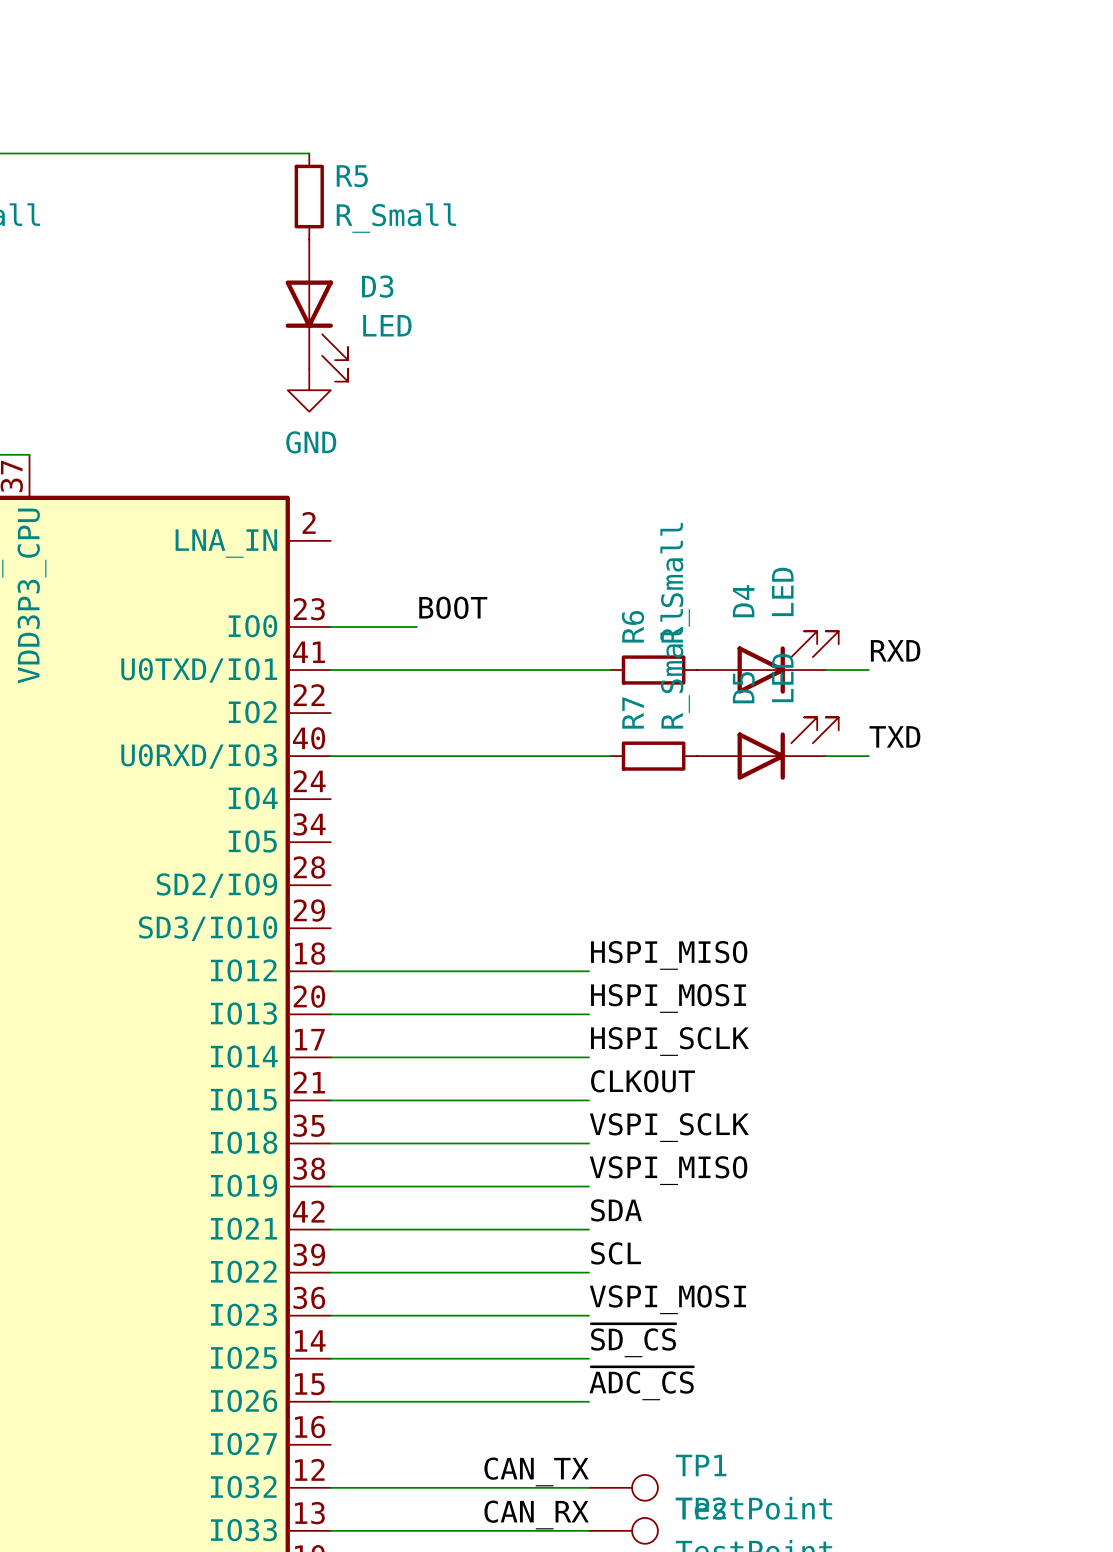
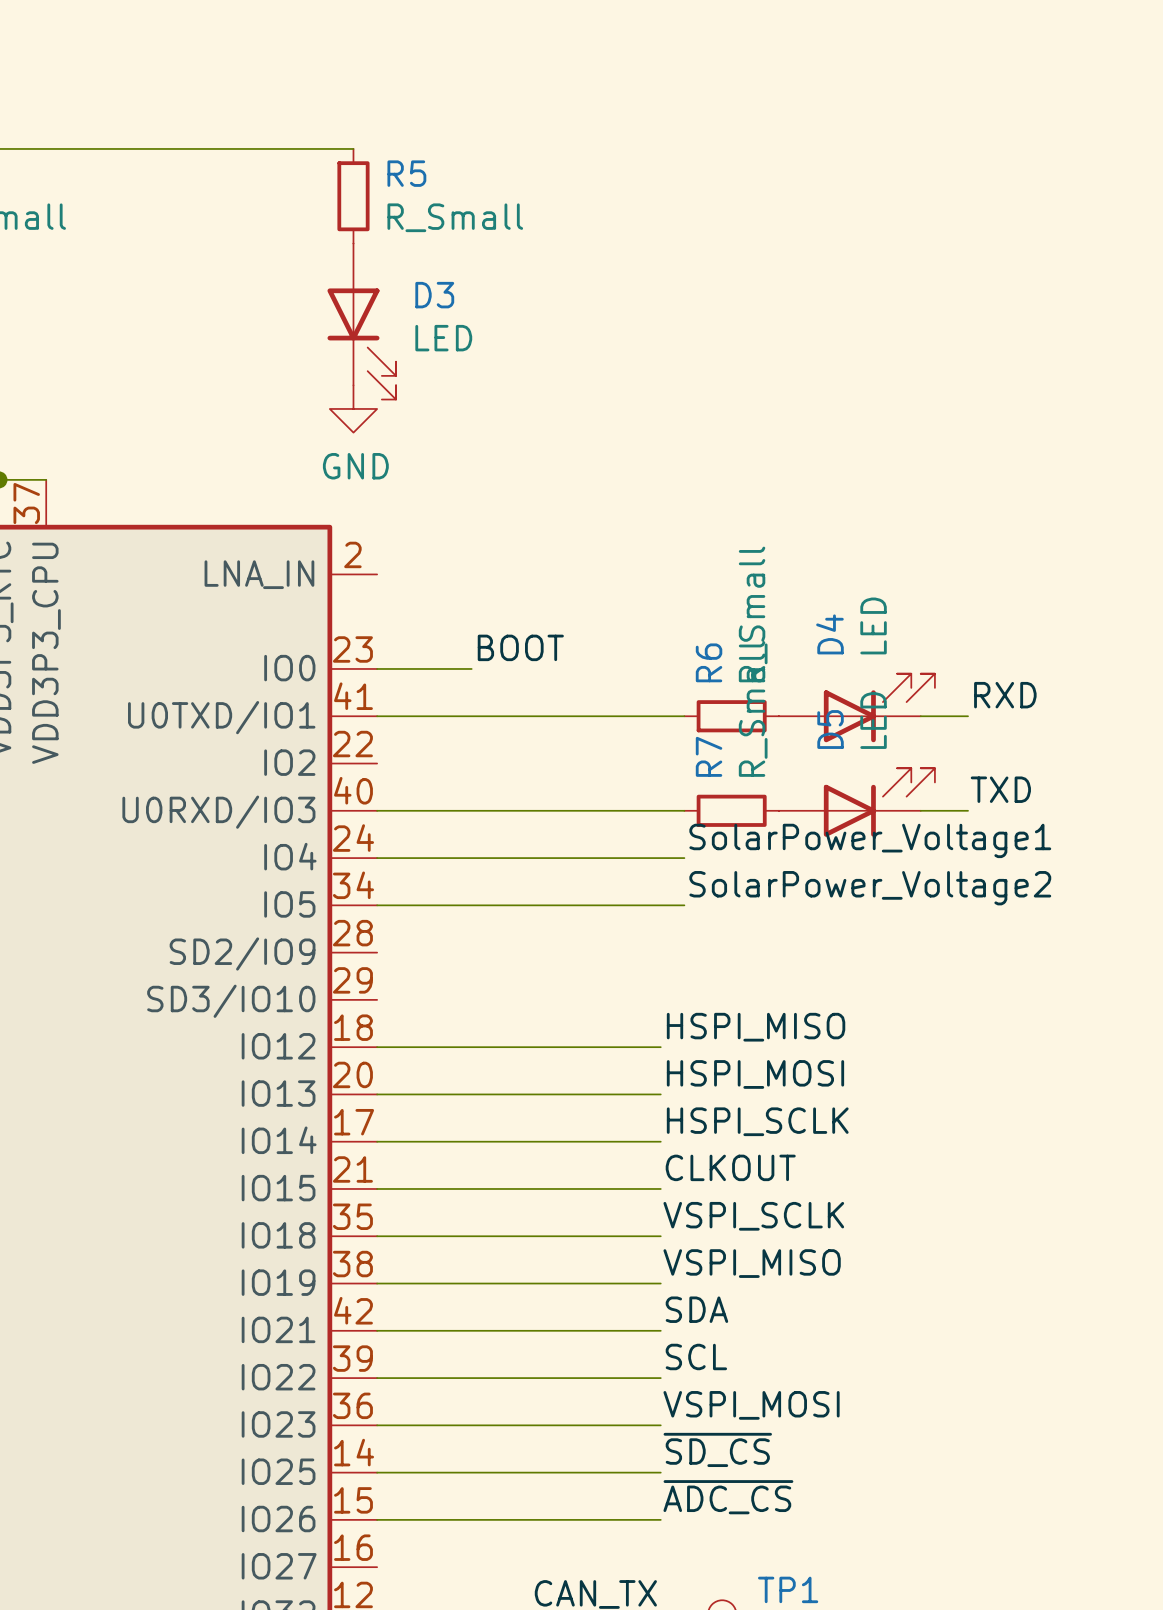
label: none -> SolarPower_Voltage1 (870, 840)
wire: none -> (377, 858) (684, 858)
label: none -> SolarPower_Voltage2 (870, 888)
wire: none -> (377, 905) (684, 905)

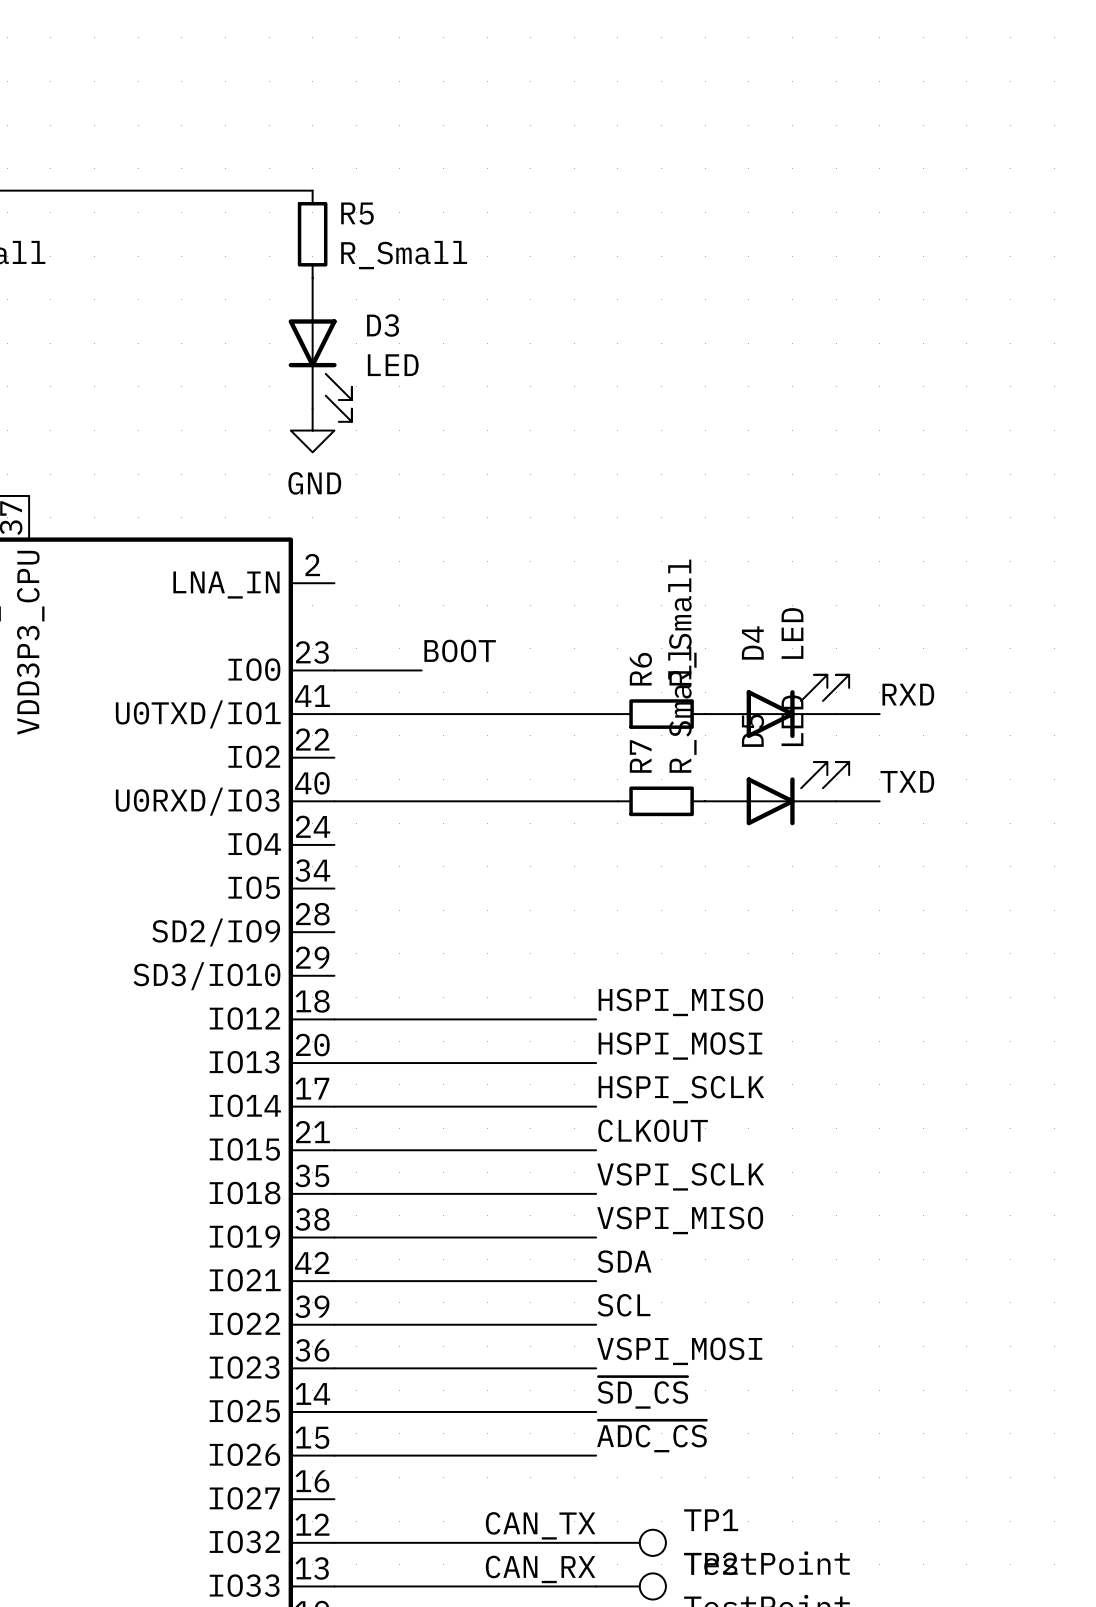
label: SolarPower_Voltage1 (870, 840) -> none
wire: (377, 858) (684, 858) -> none
label: SolarPower_Voltage2 (870, 888) -> none
wire: (377, 905) (684, 905) -> none

